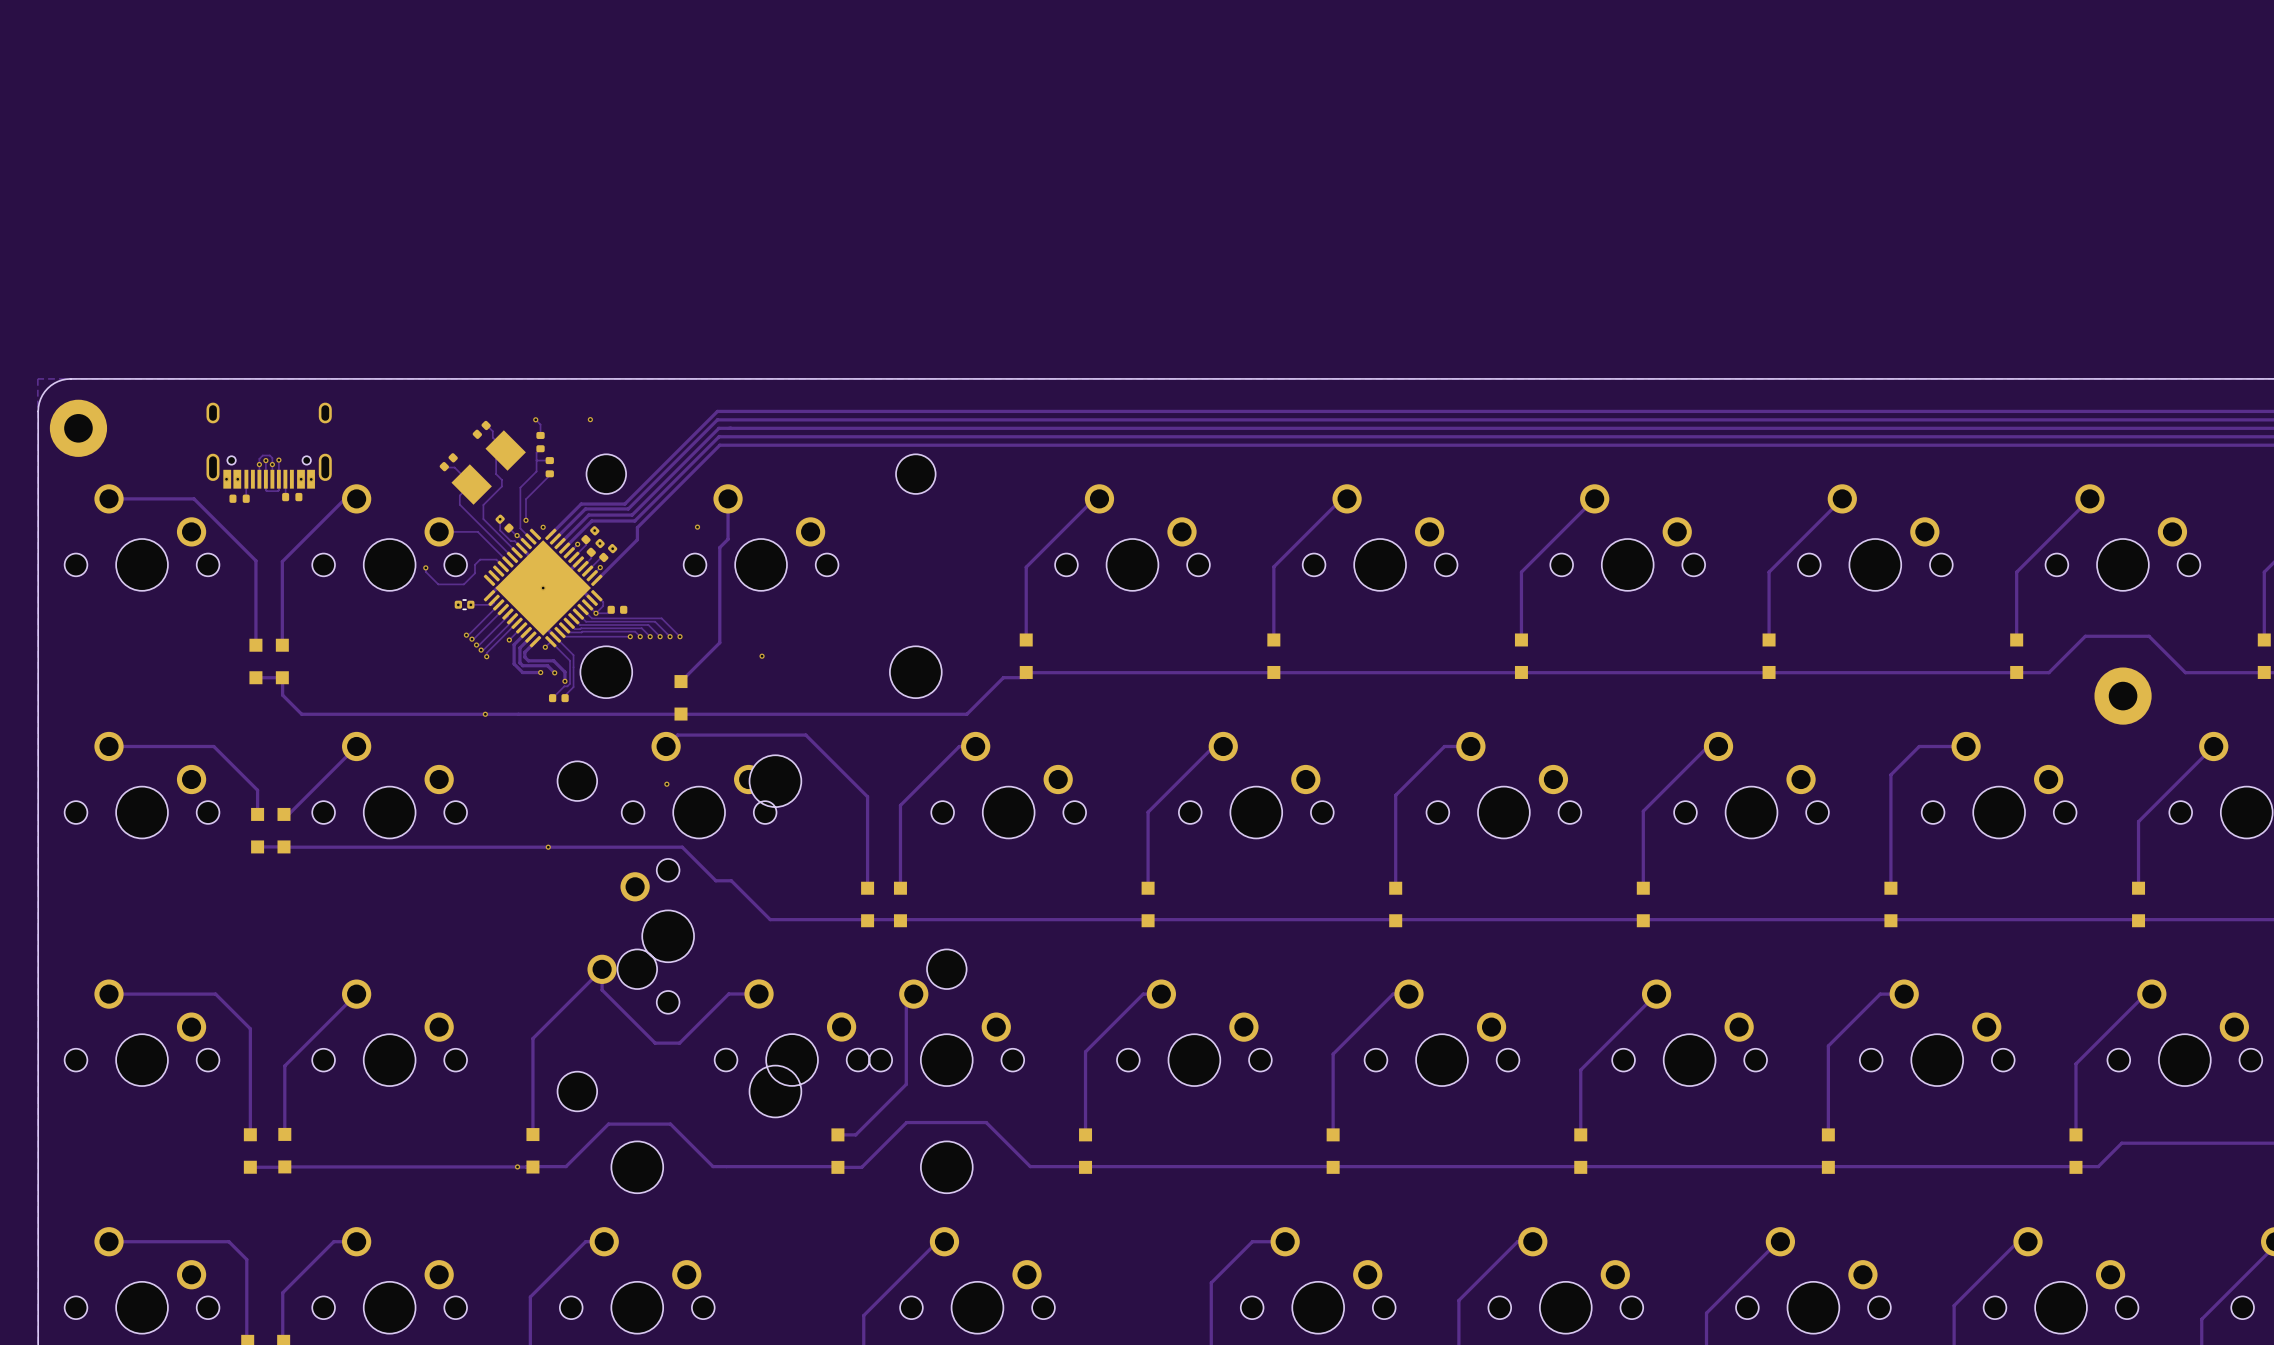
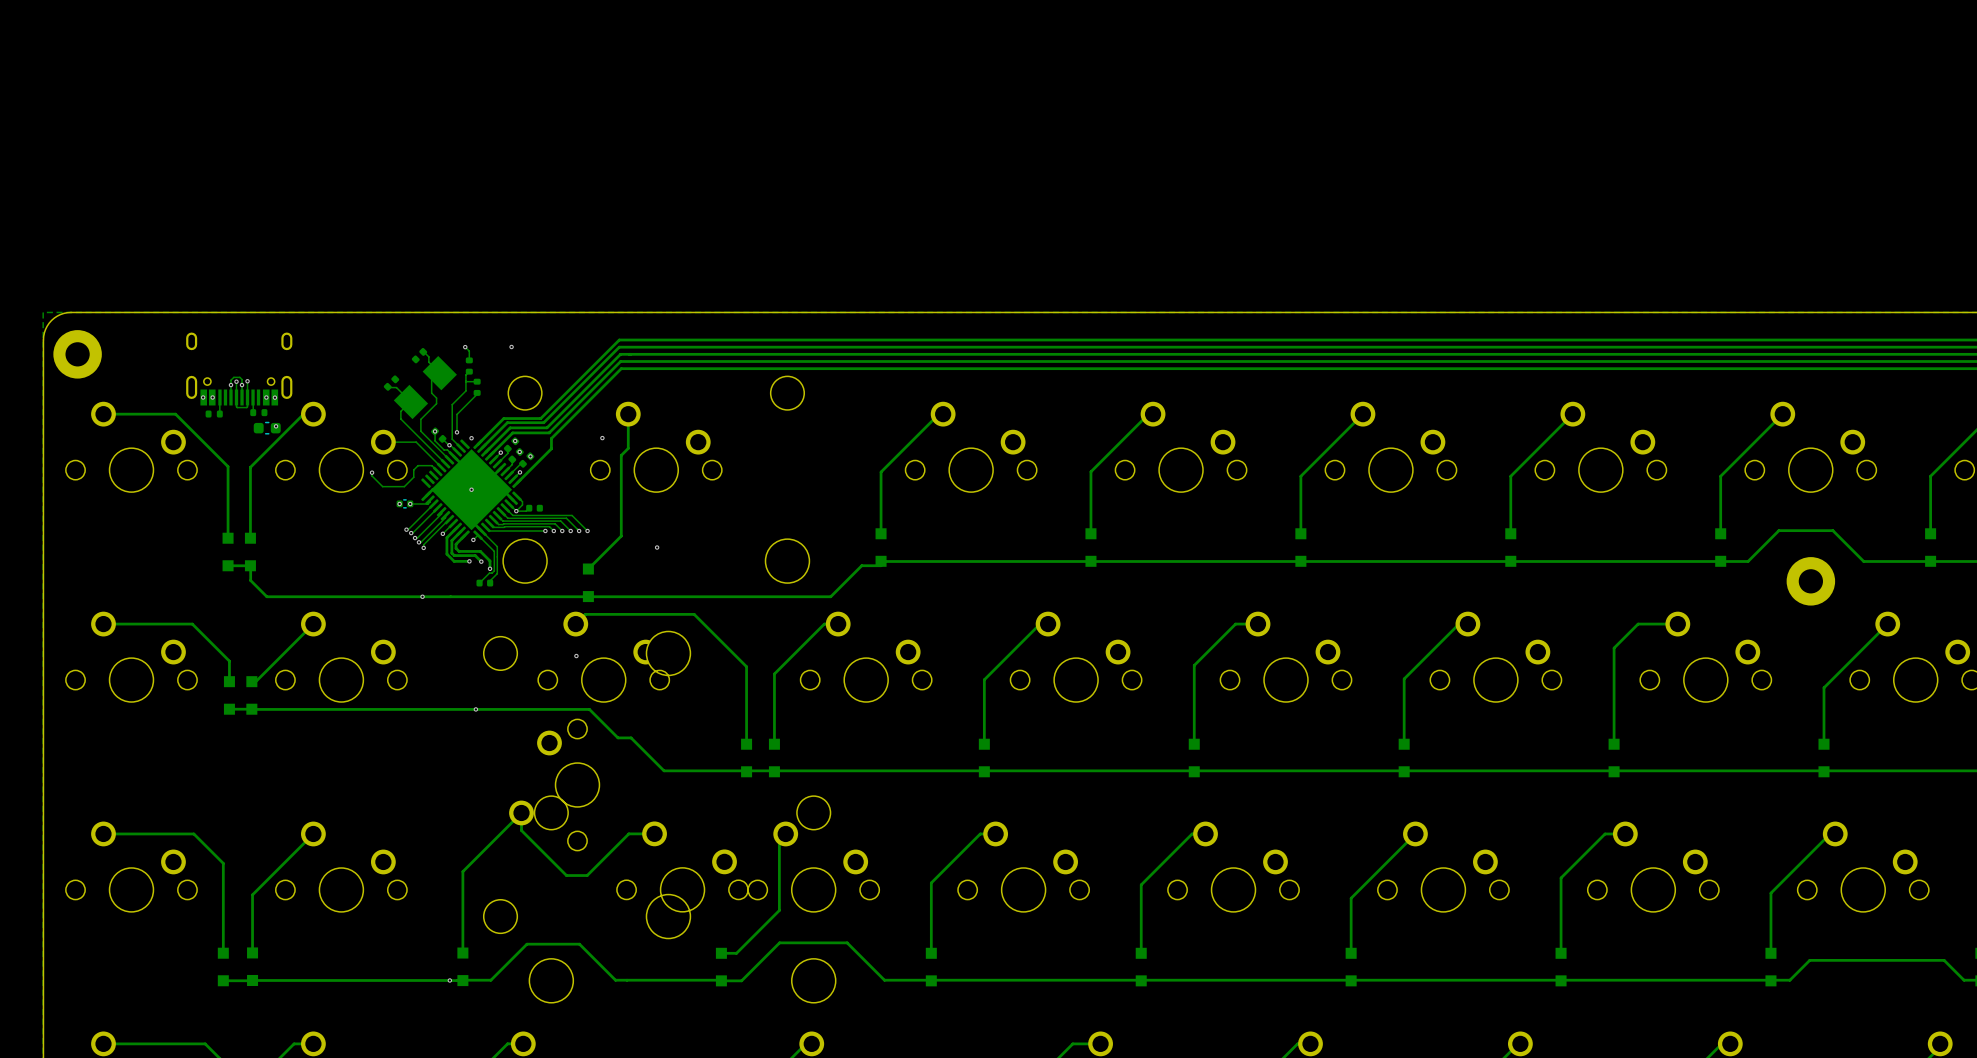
via: none -> (276, 426)
part: none -> (267, 428)

